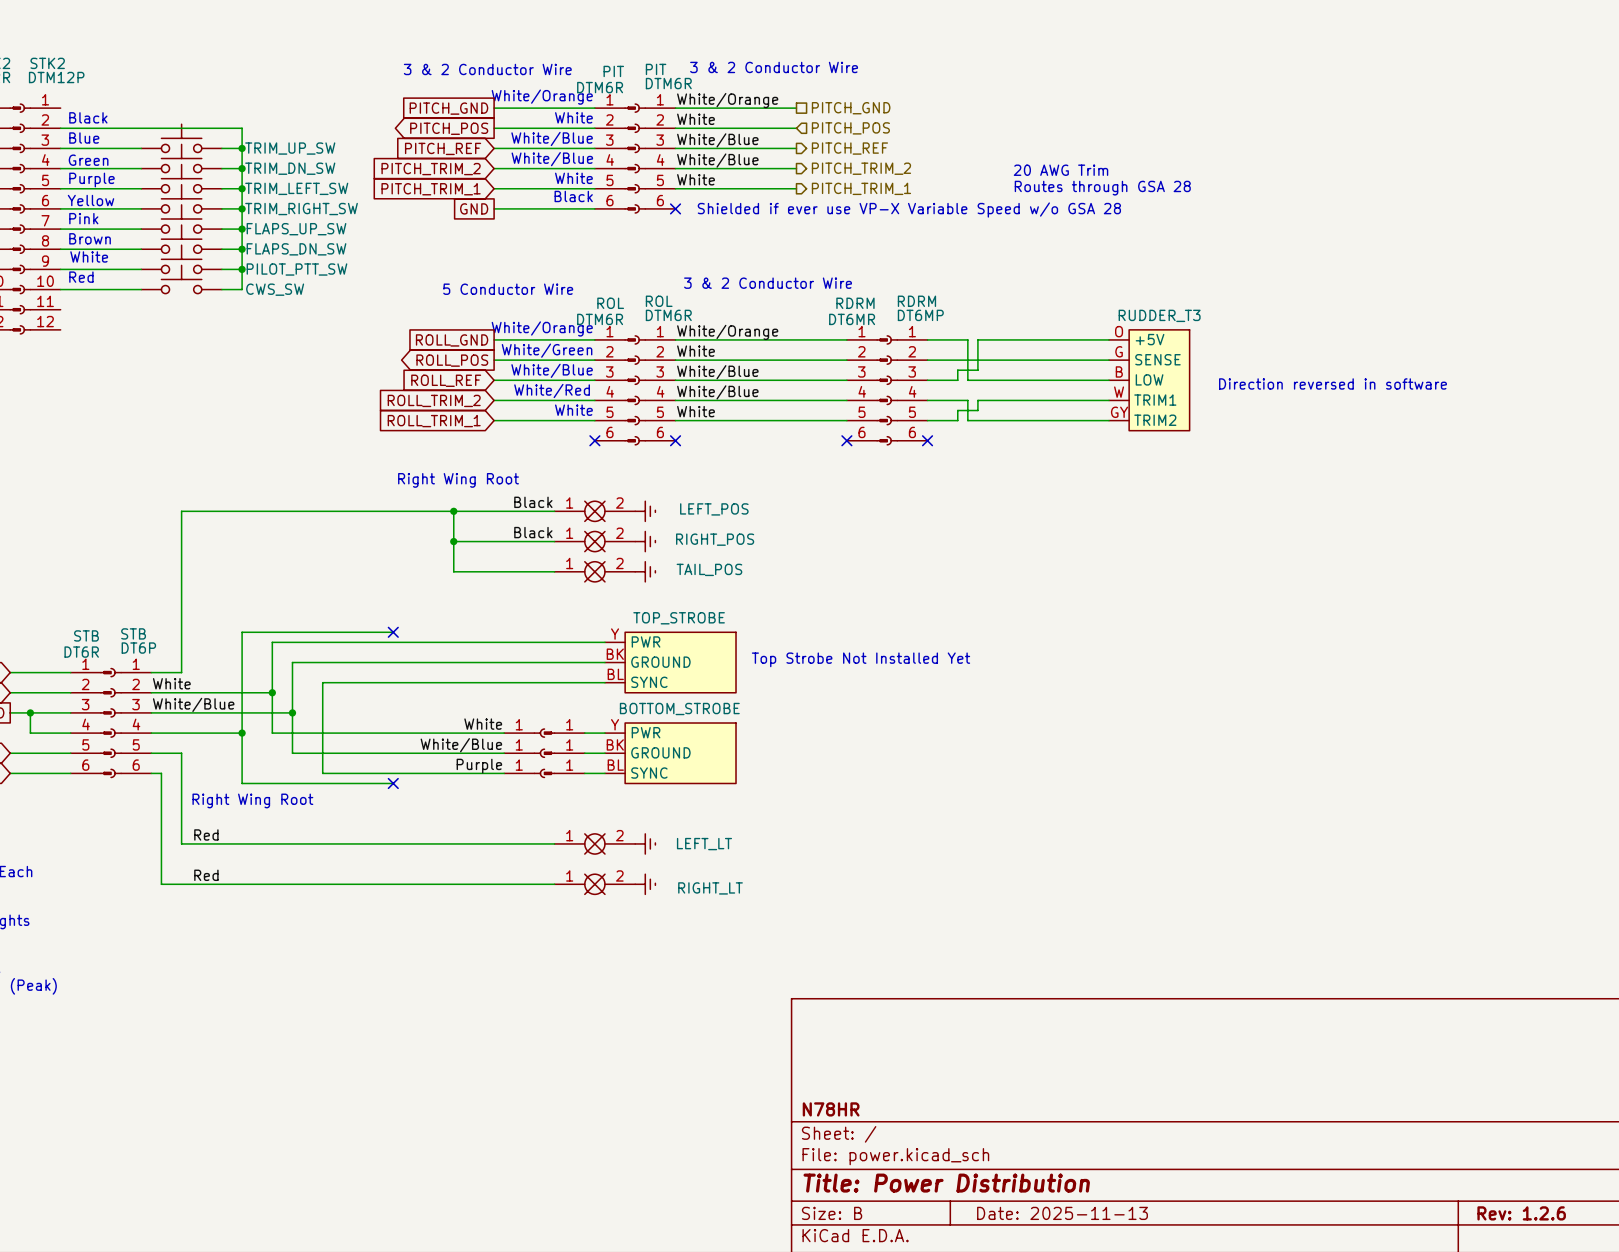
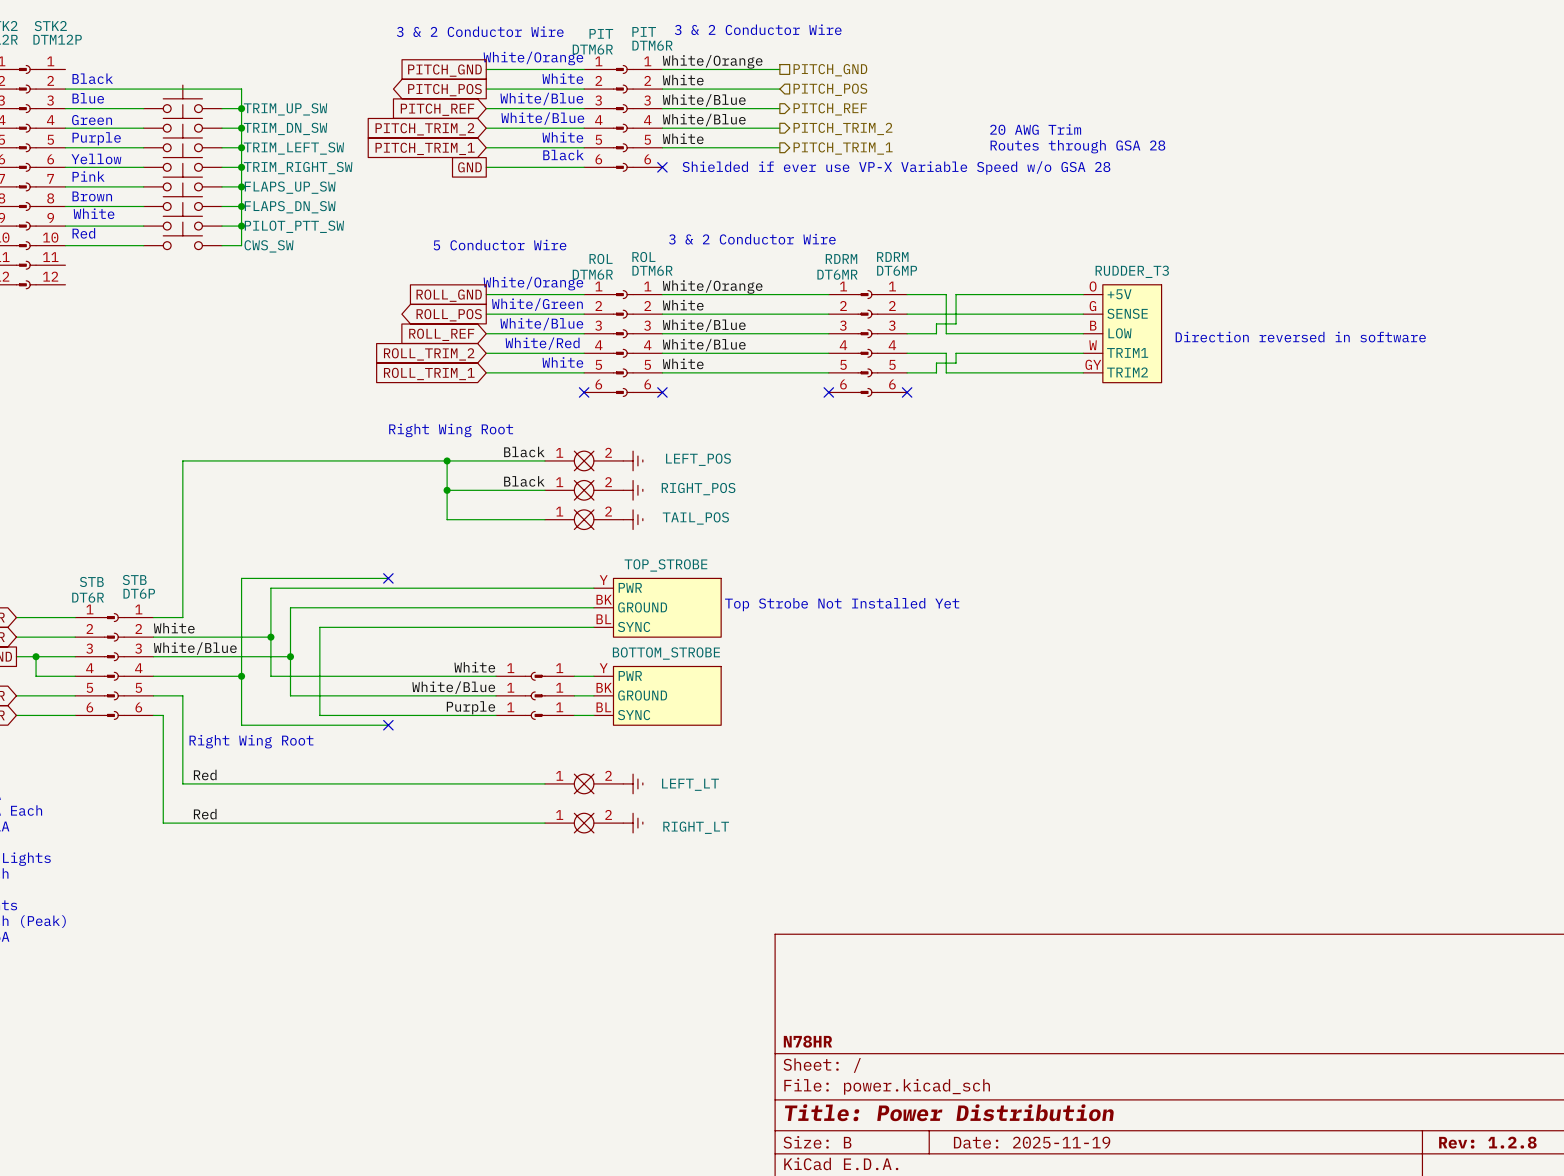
title block: Date: 2025-11-13 (1062, 1213) -> Date: 2025-11-19 (1032, 1142)
title block: Rev: 1.2.6 (1521, 1213) -> Rev: 1.2.8 (1487, 1142)

